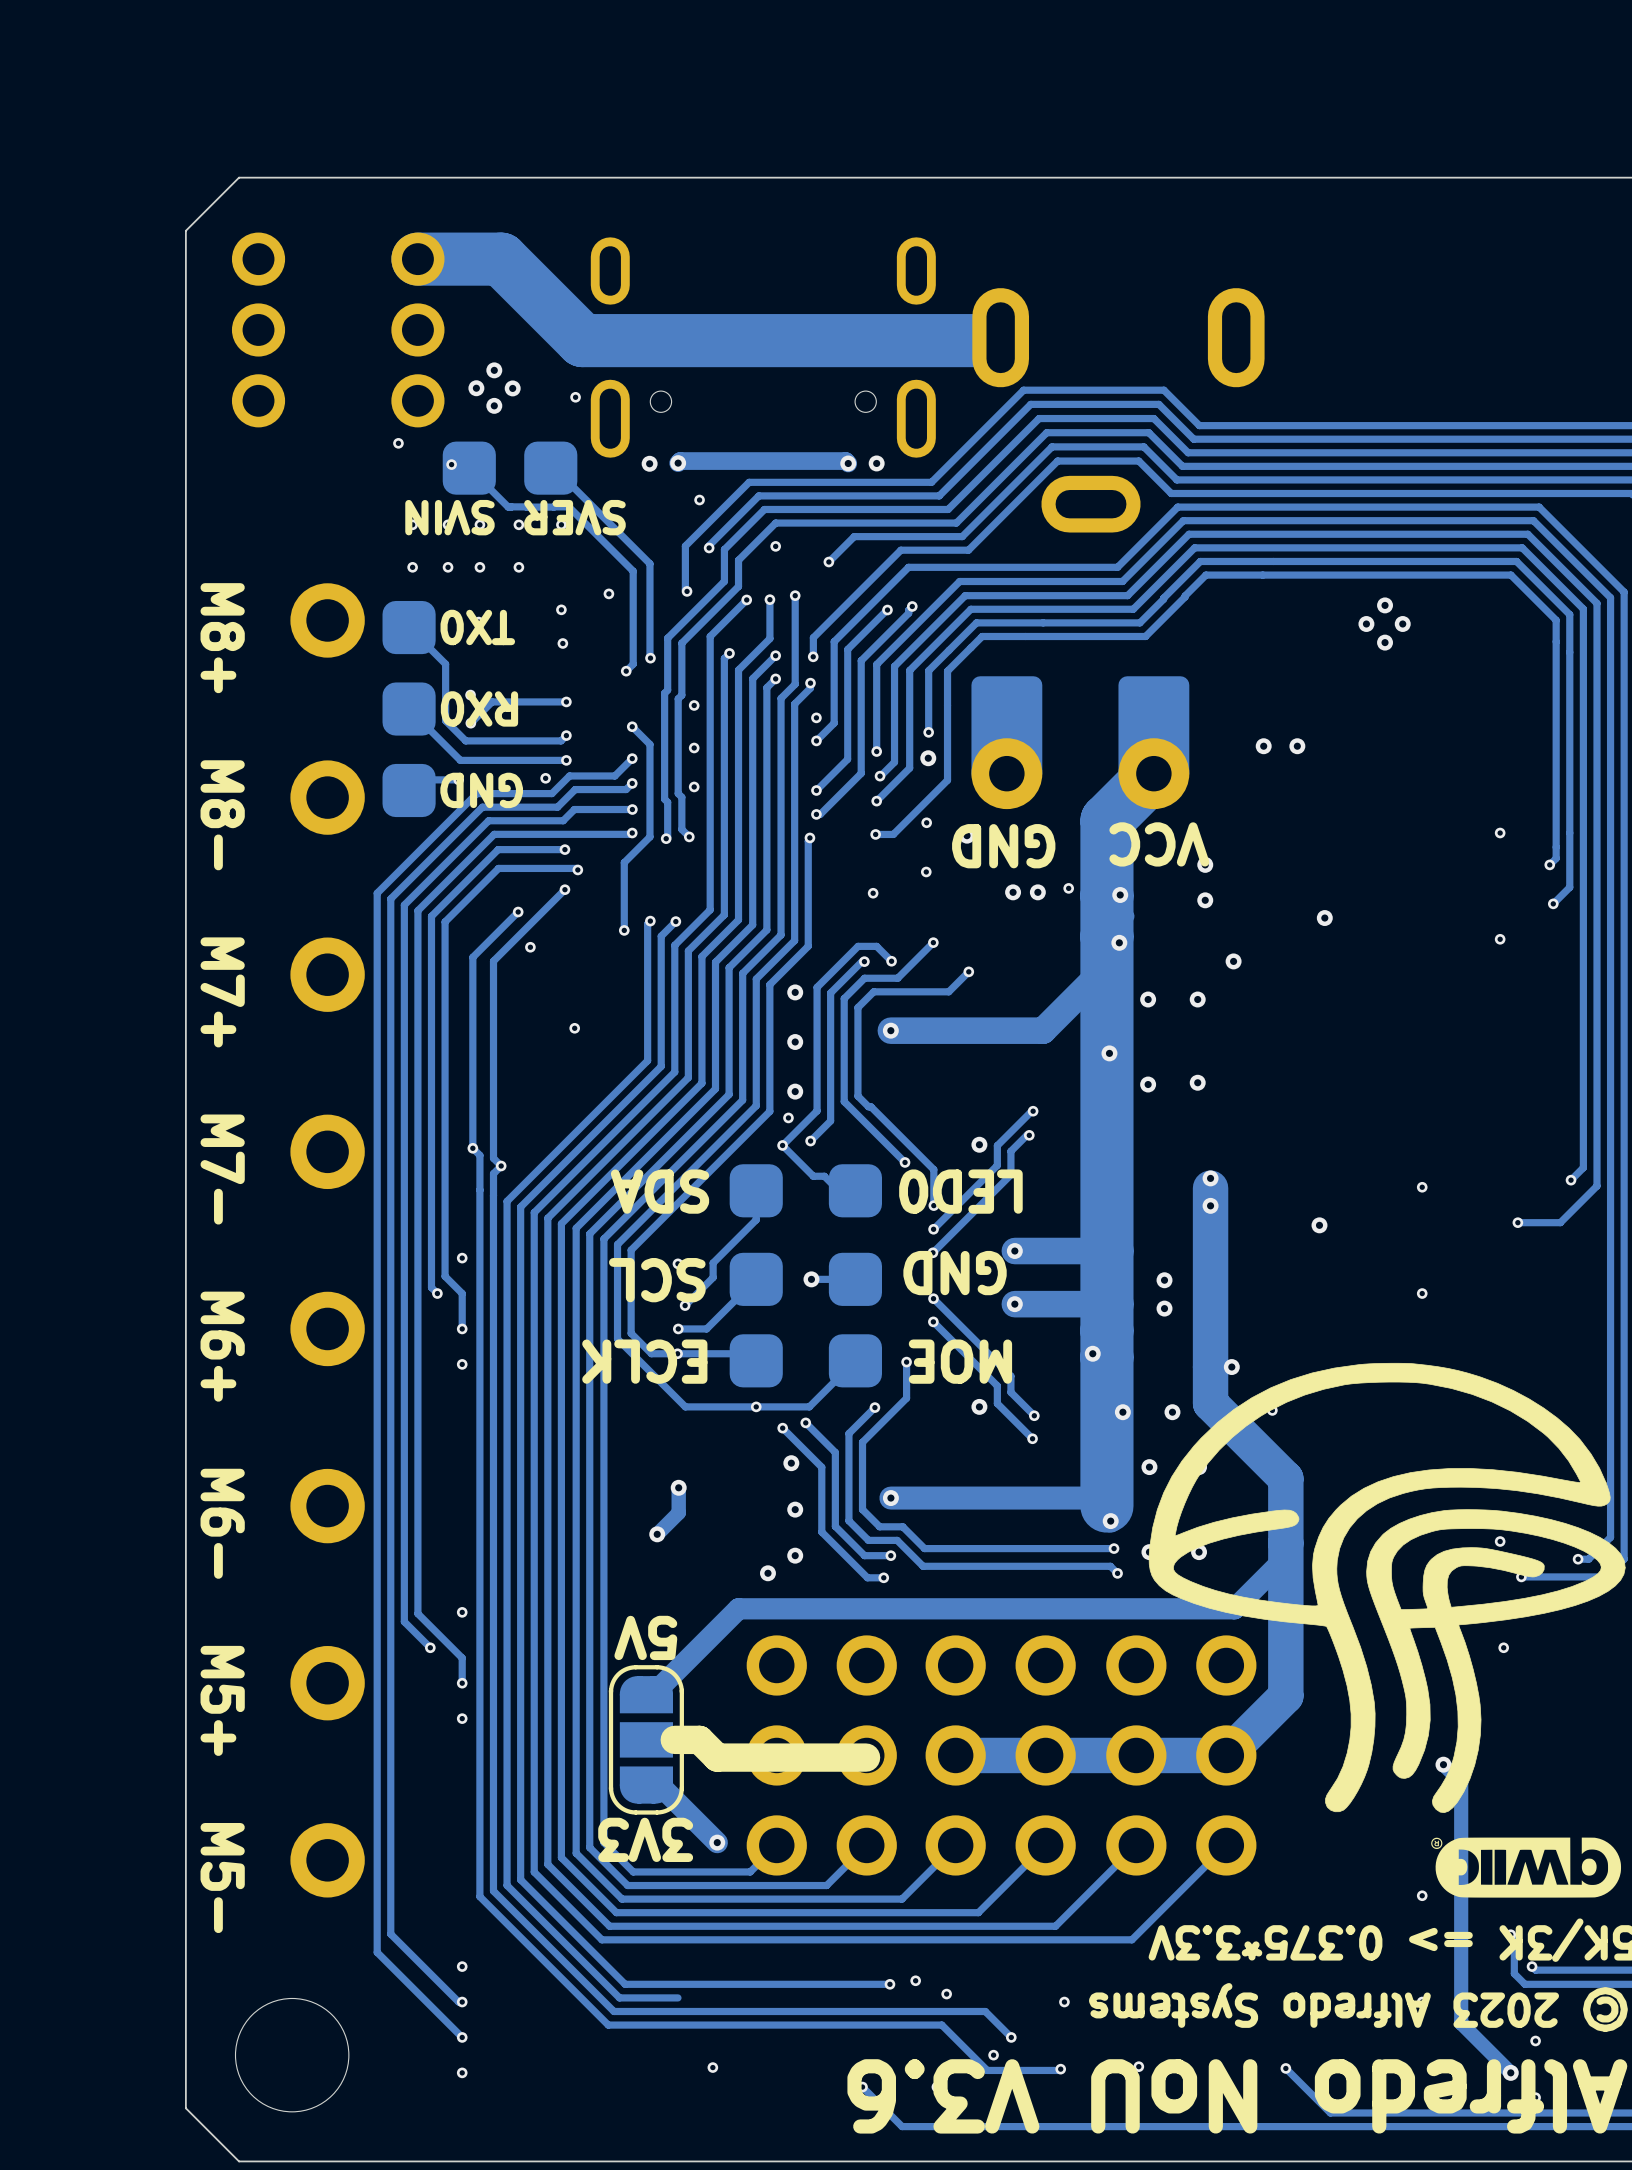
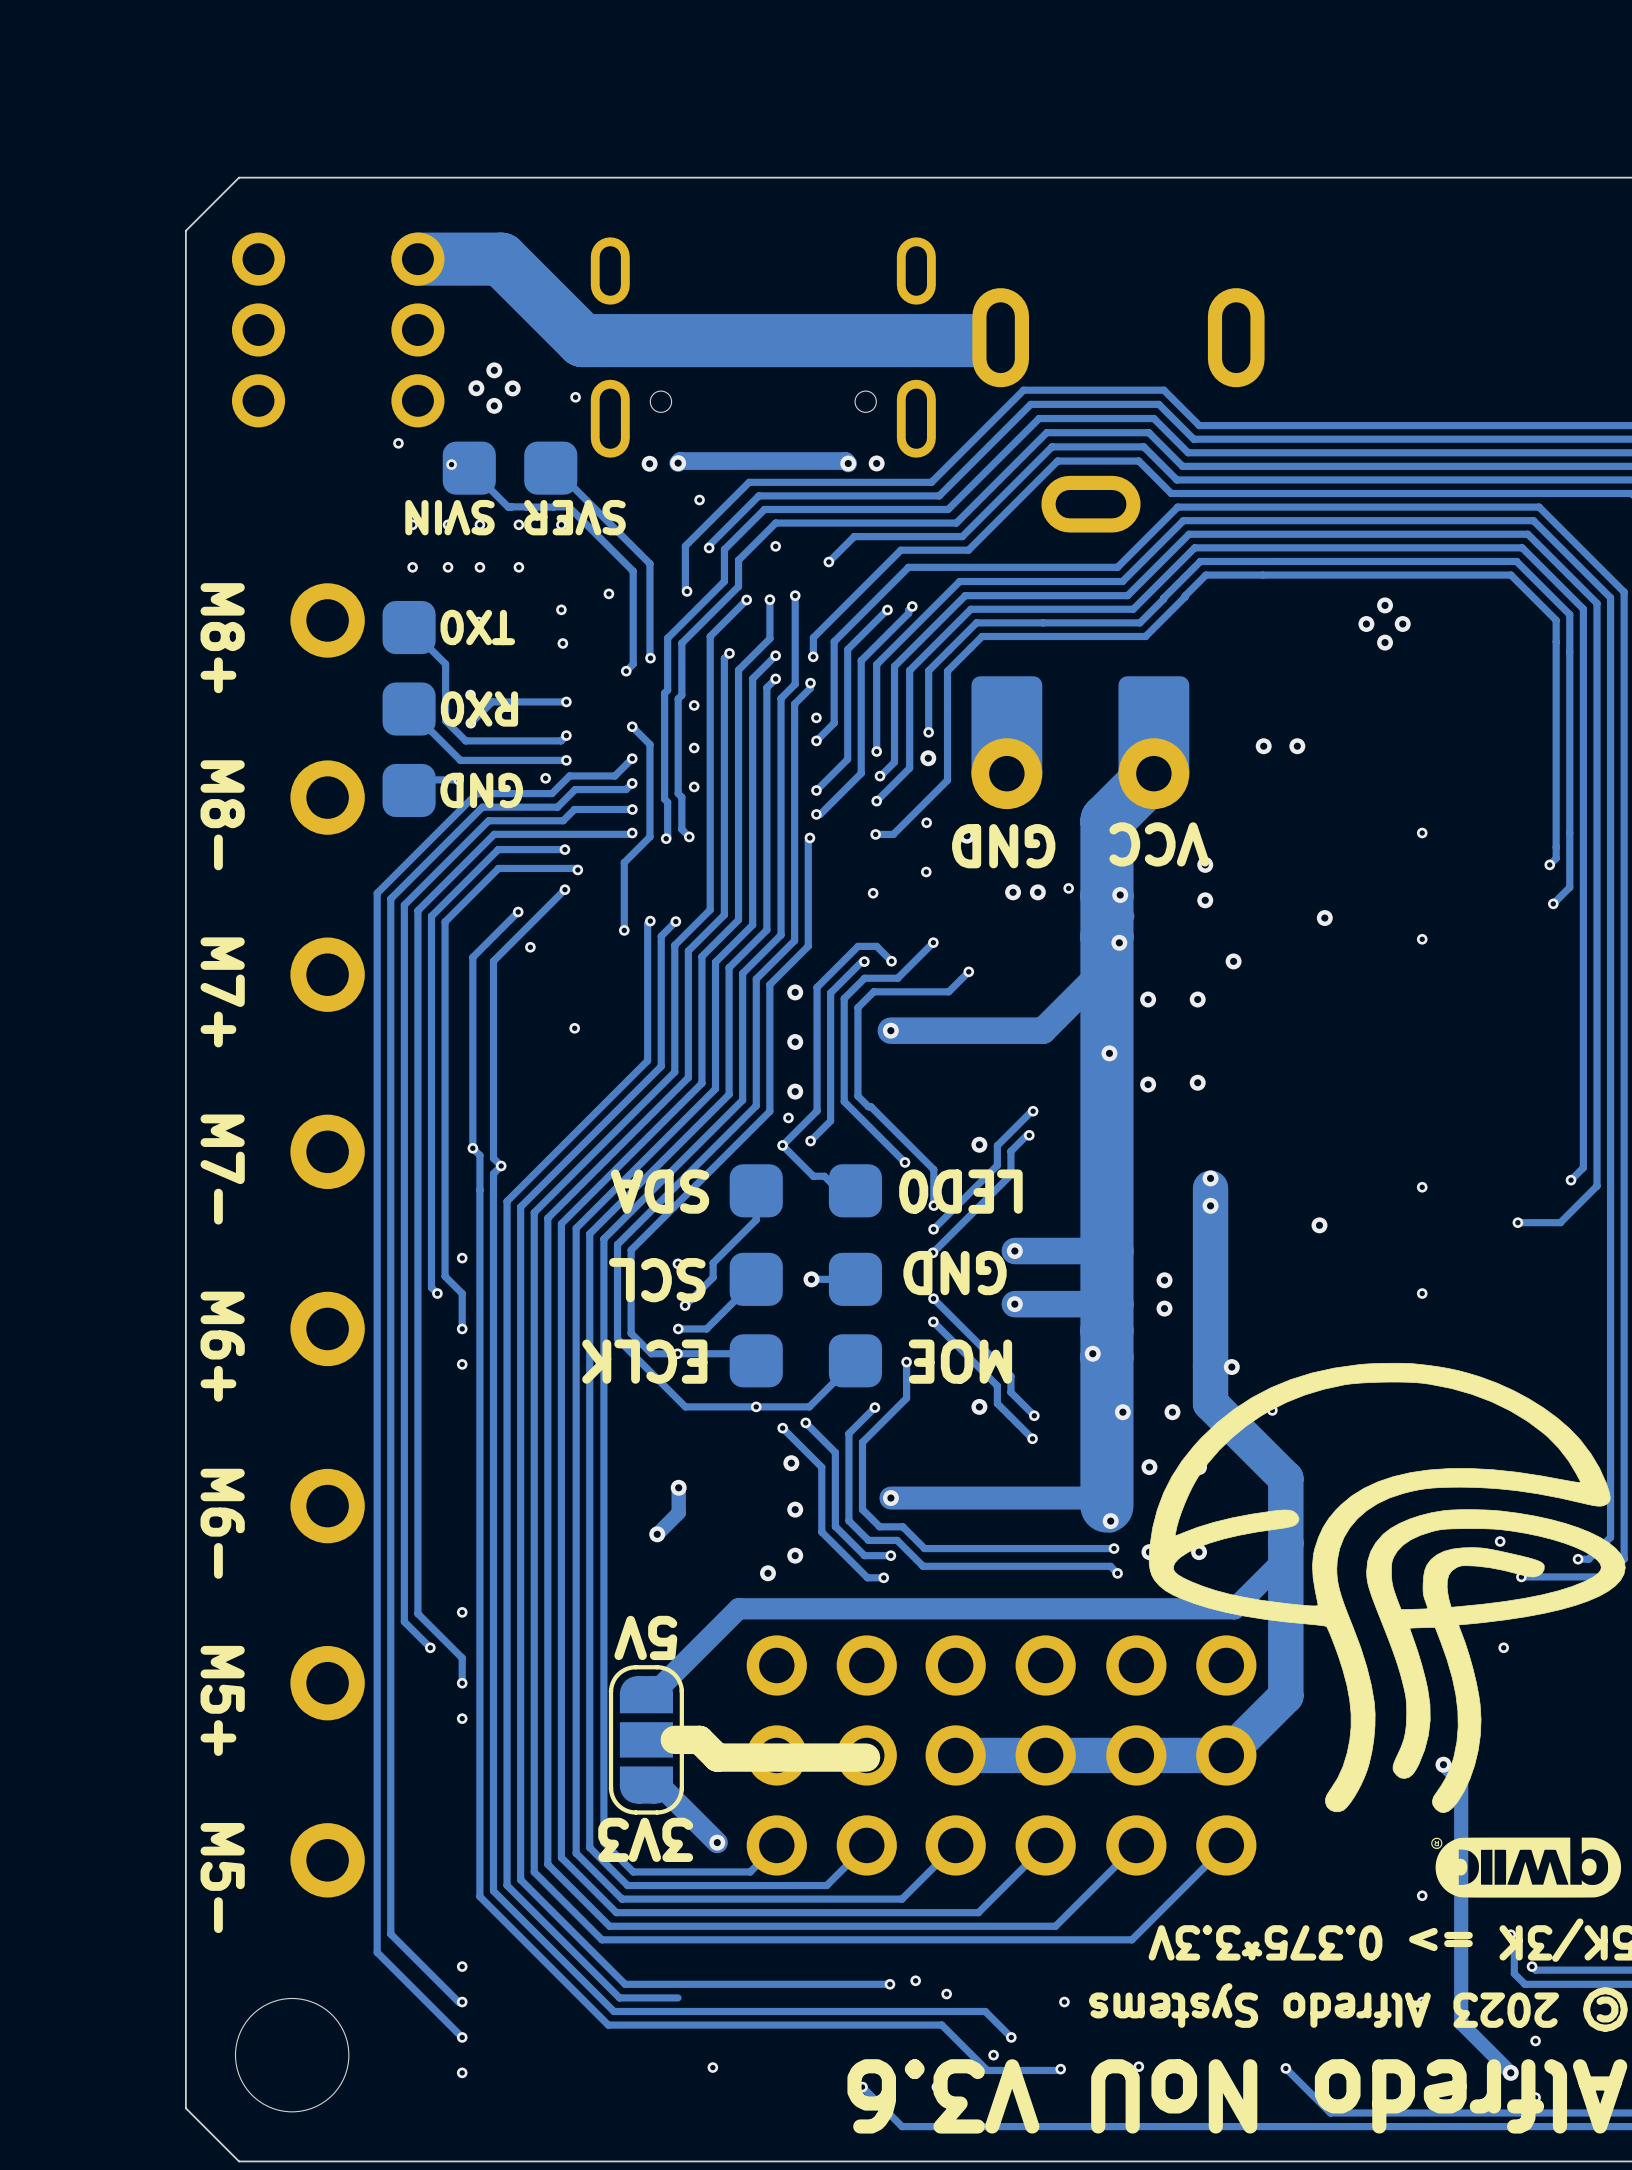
via: none -> (1422, 833)
via: (1500, 833) -> none
via: none -> (1422, 939)
via: (1500, 939) -> none

